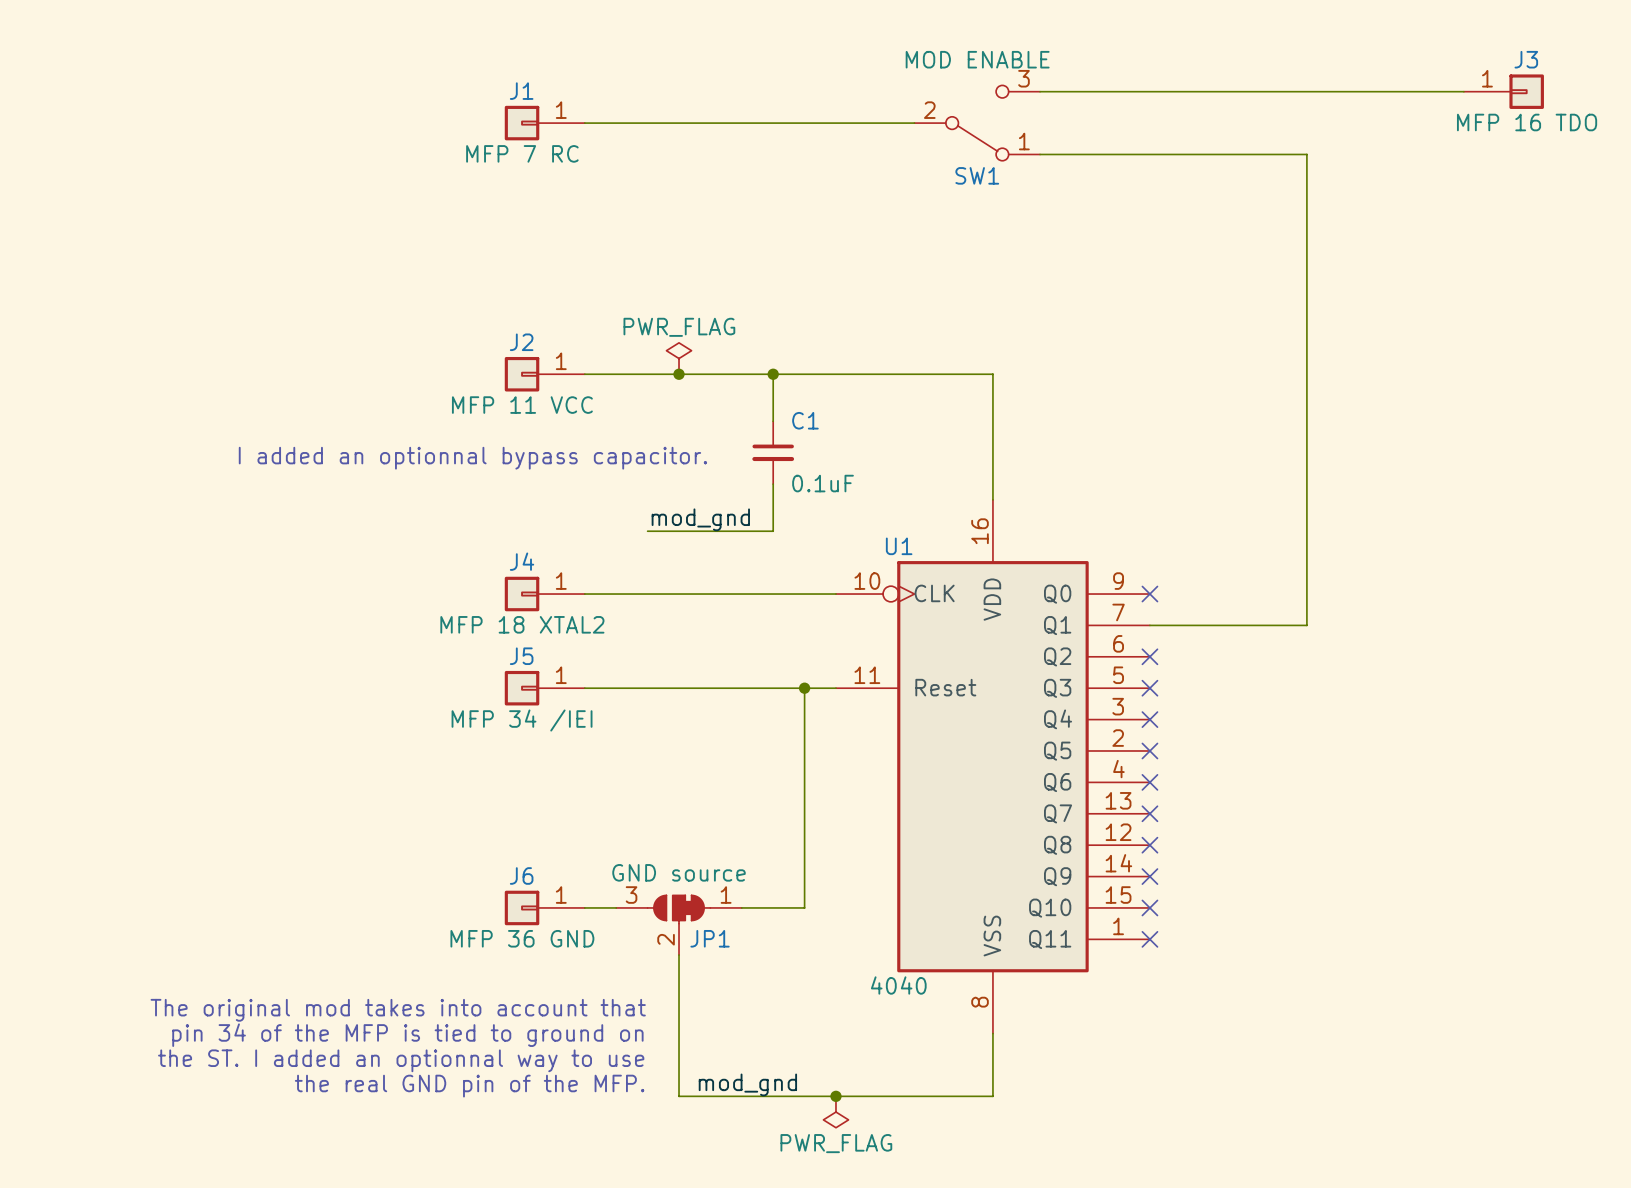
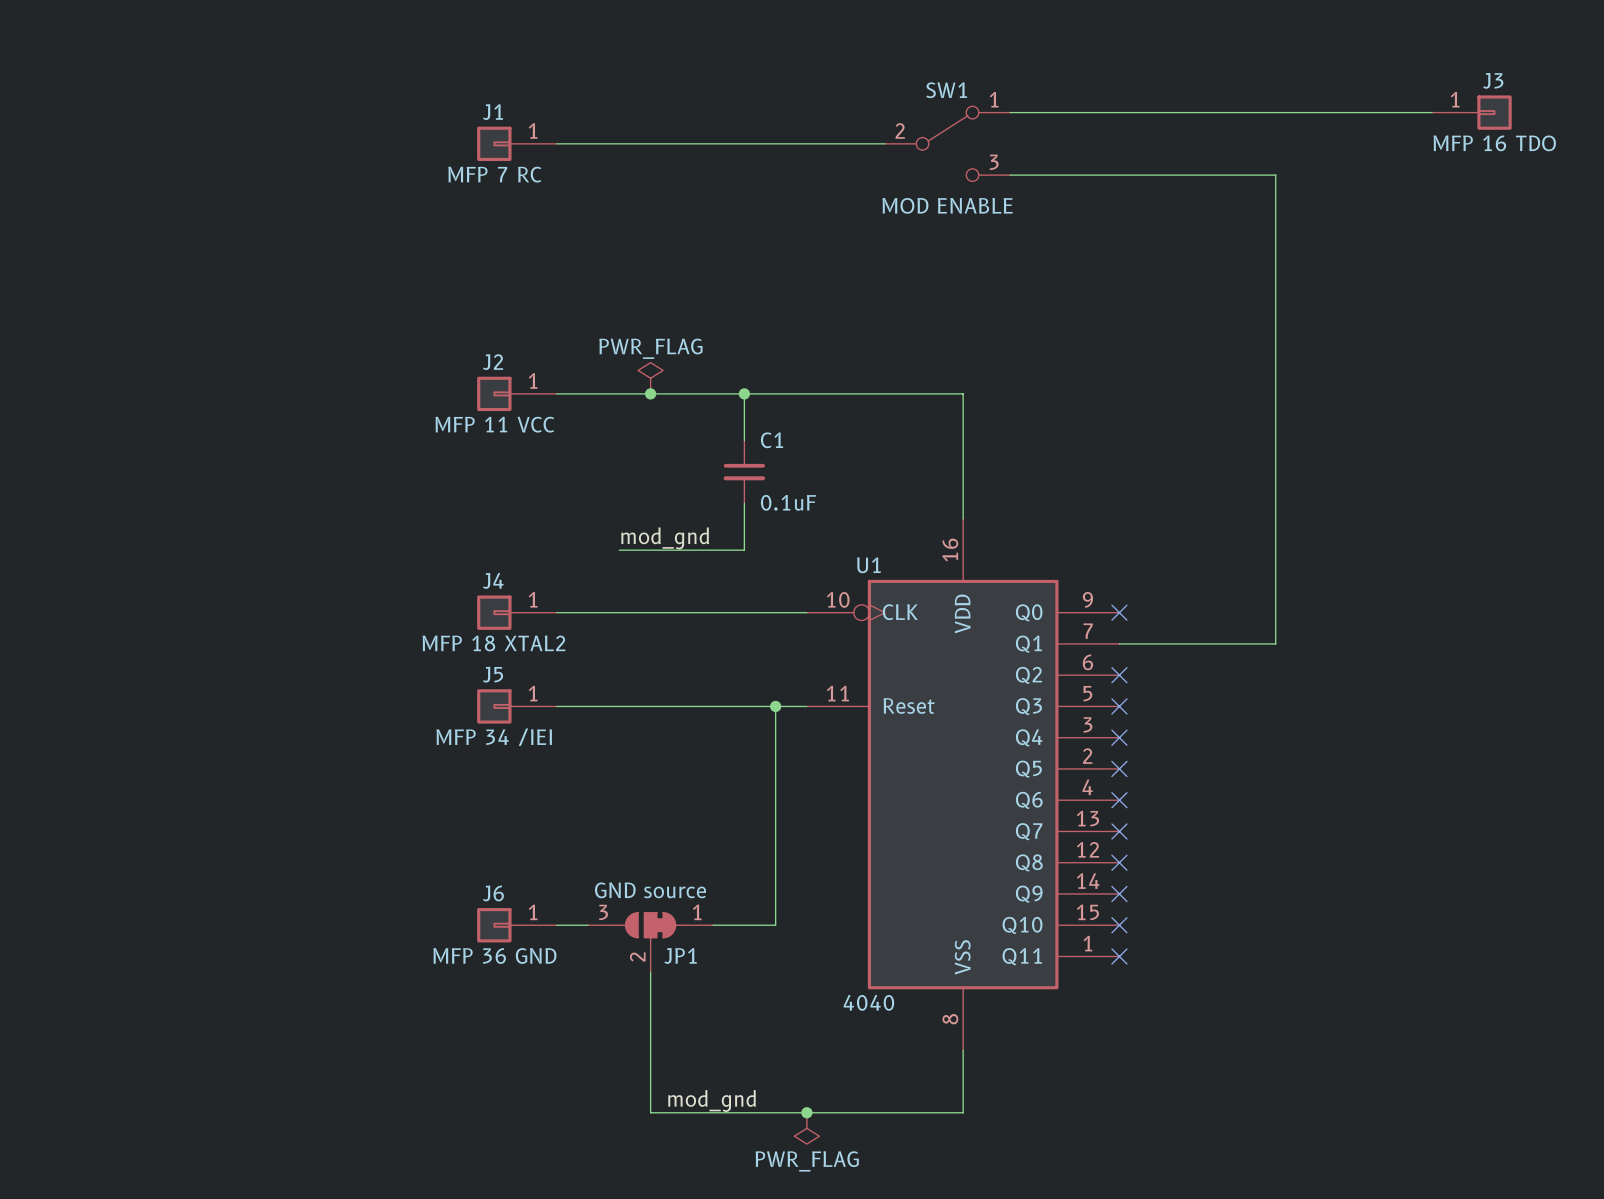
SW1 flip: as is (977, 123) -> up-down (947, 143)
text: I added an optionnal bypass capacitor. (472, 458) -> none
text: The original mod takes into account that (398, 1010) -> none
text: pin 34 of the MFP is tied to ground on (407, 1035) -> none
text: the ST. I added an optionnal way to use (401, 1060) -> none
text: the real GND pin of the MFP. (469, 1086) -> none

